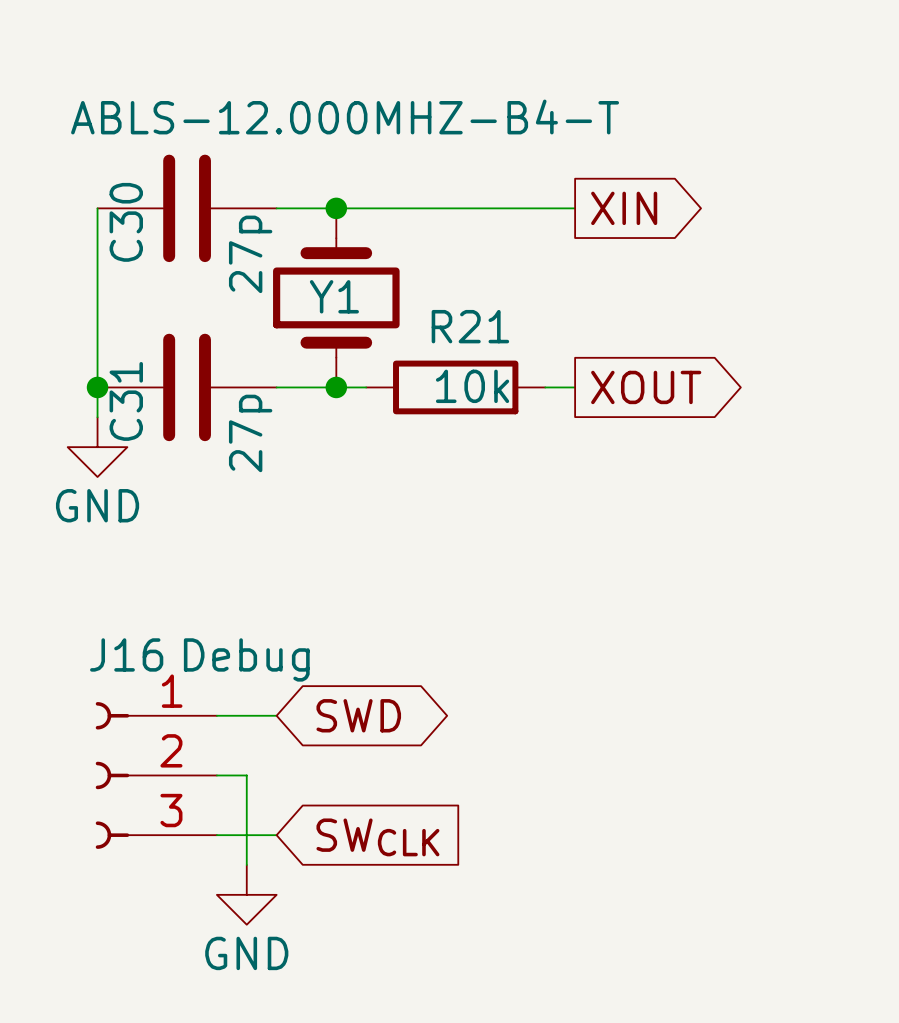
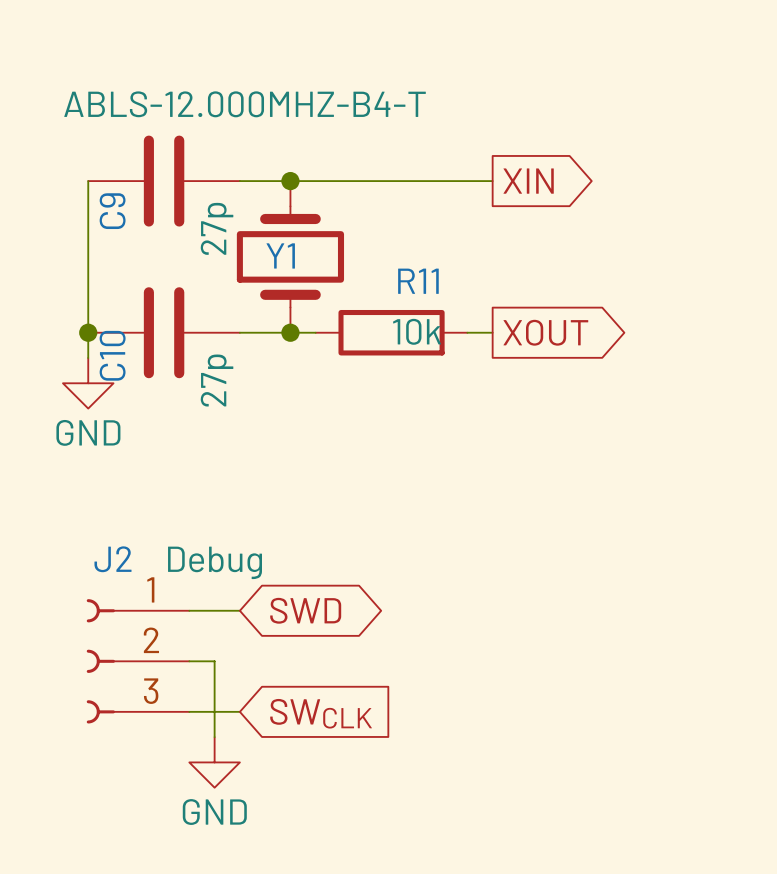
C30 name: C30 (126, 222) -> C9 (112, 211)
R21 name: R21 (470, 326) -> R11 (418, 281)
C31 name: C31 (126, 401) -> C10 (112, 355)
J16 name: J16 (126, 654) -> J2 (112, 559)

